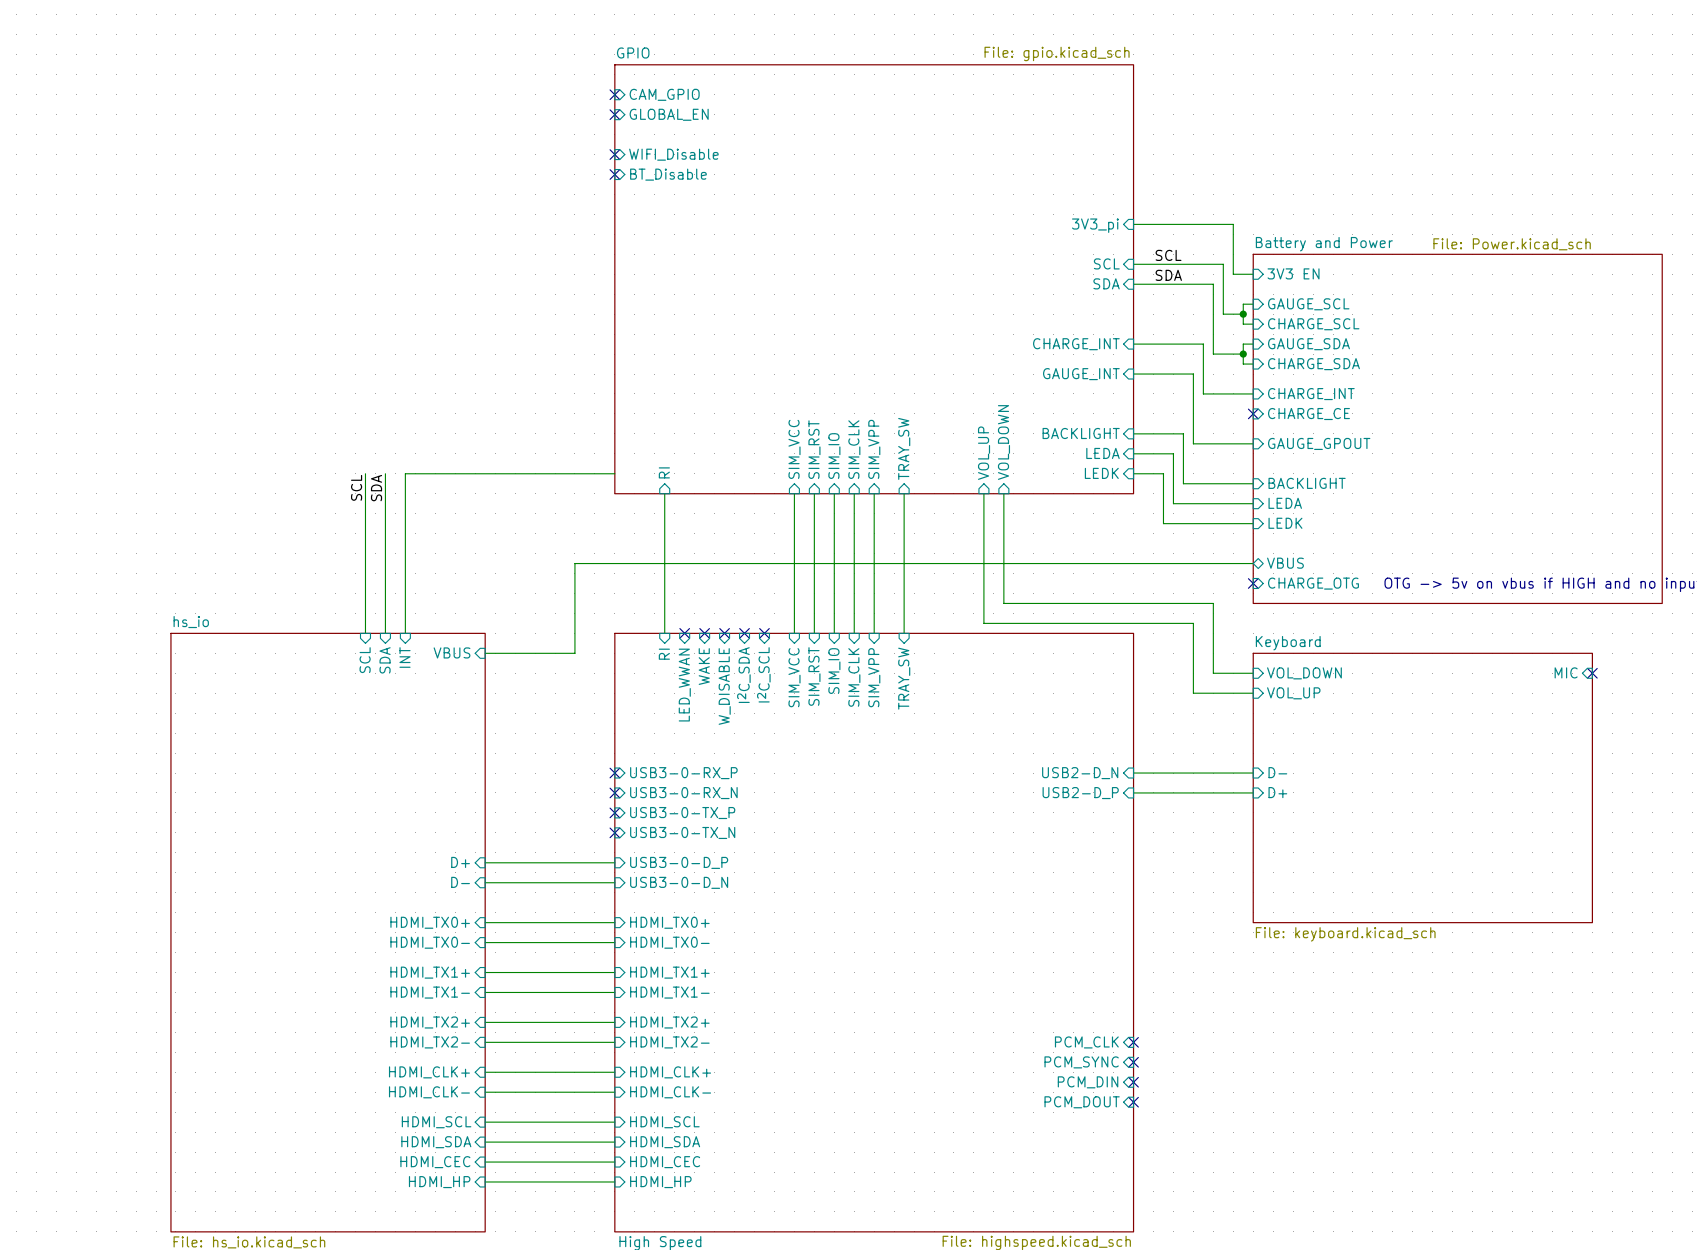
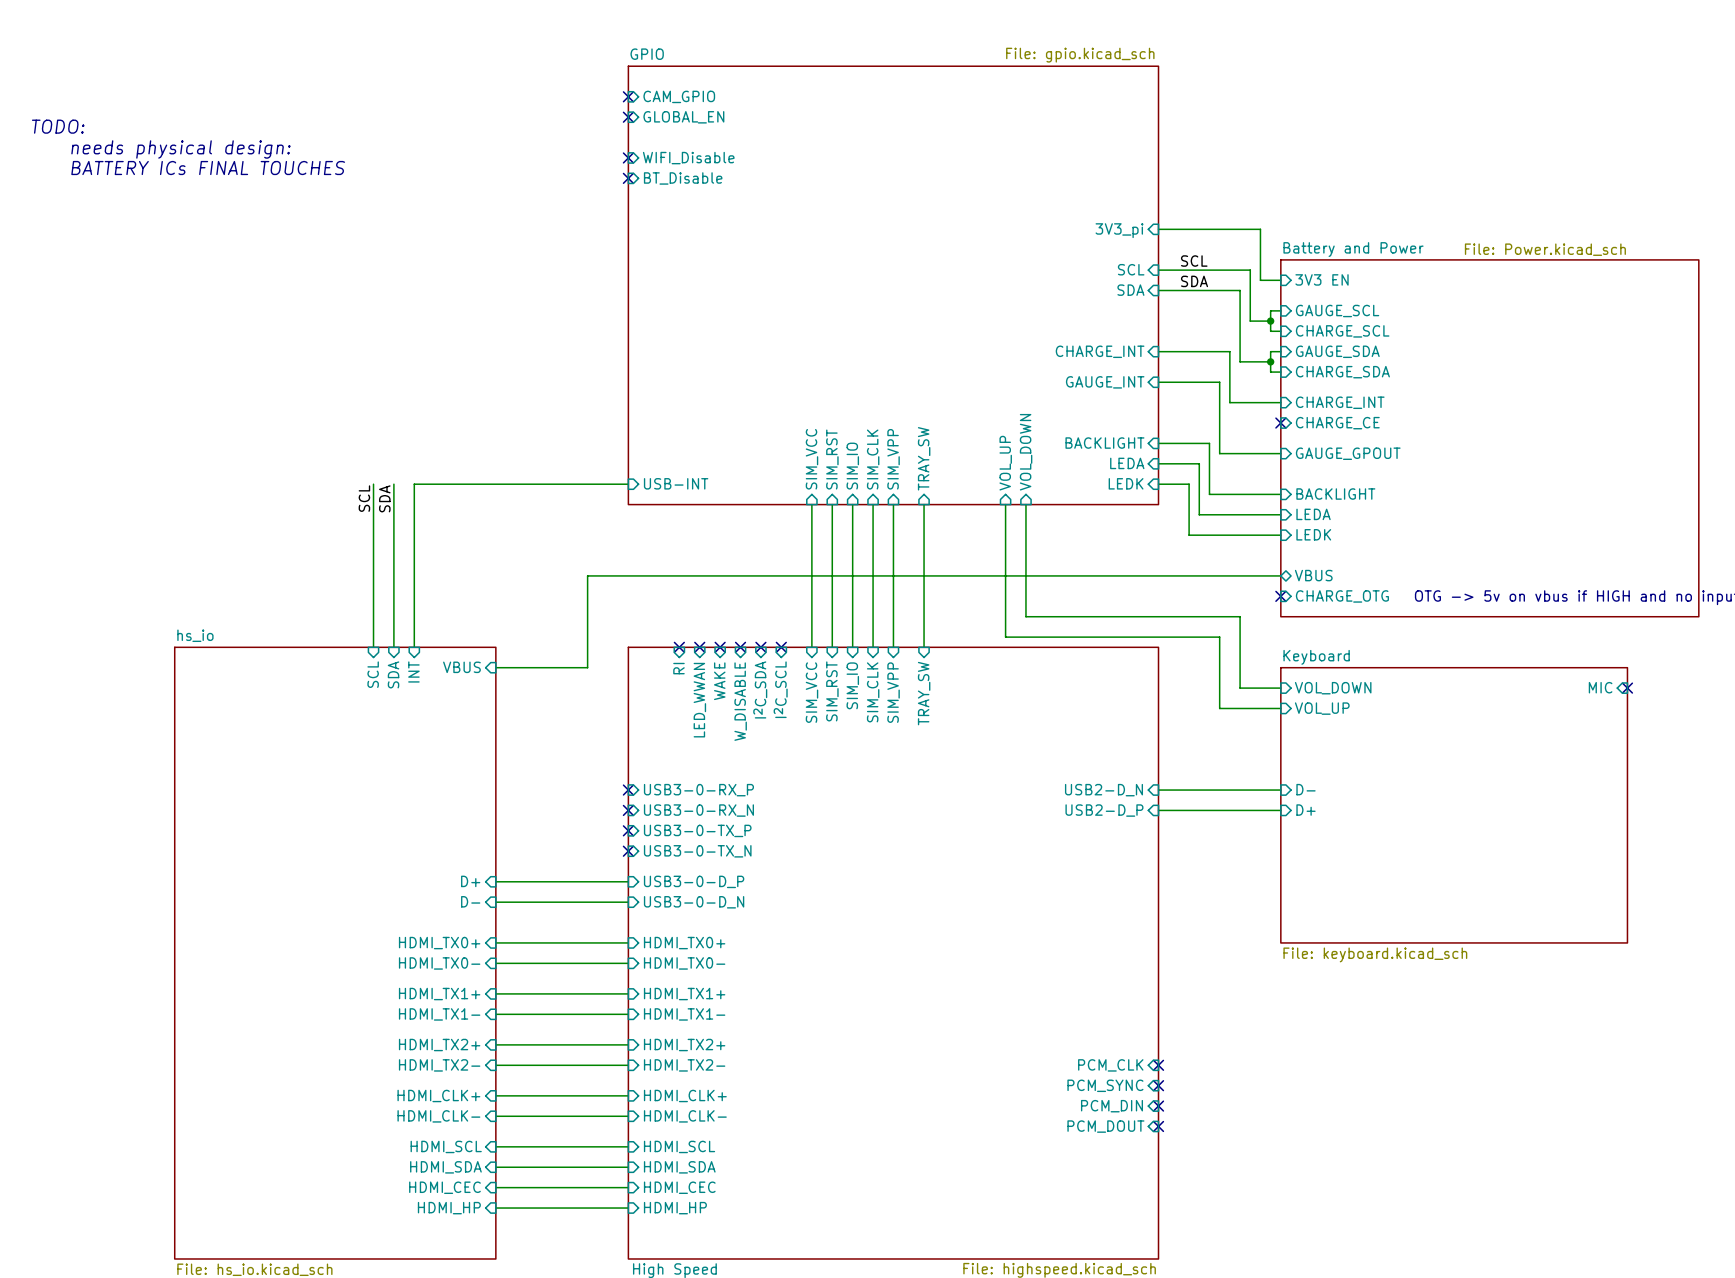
text: none -> TODO: (58, 126)
text: none -> needs physical design: (180, 149)
text: none -> BATTERY ICs FINAL TOUCHES (208, 168)
sheet pin: RI (664, 472) -> none
sheet pin: none -> USB-INT (676, 483)
wire: (664, 493) (664, 633) -> none
no-connect mark: none -> (679, 647)

